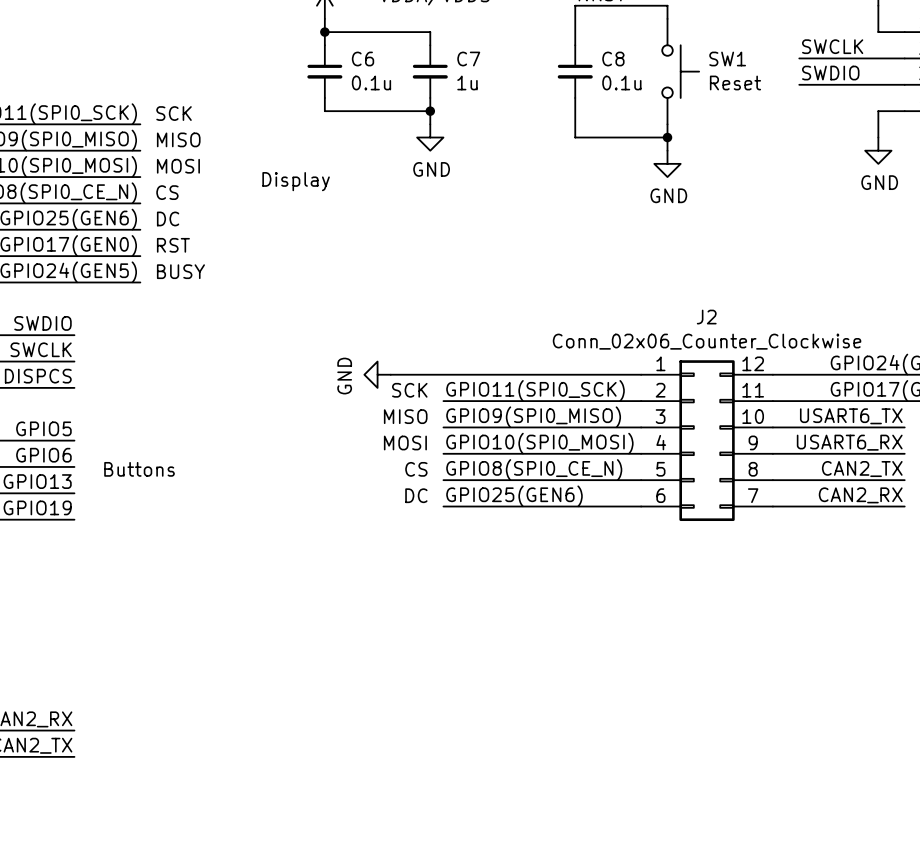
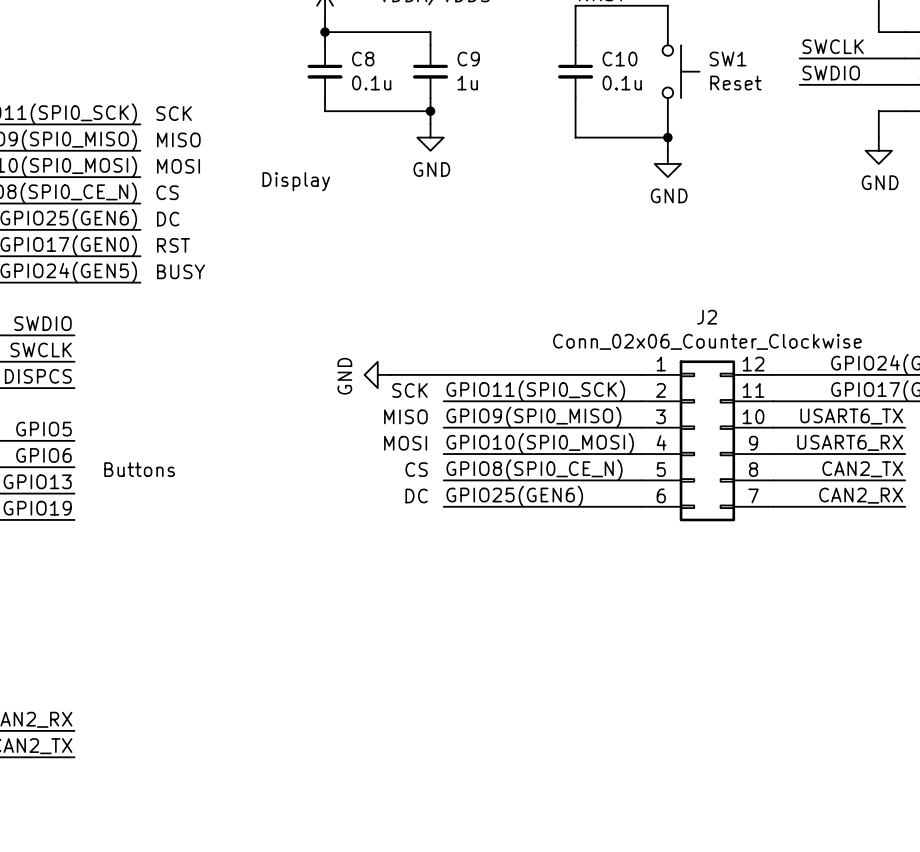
C6 name: C6 (363, 59) -> C8 (363, 59)
C7 name: C7 (468, 59) -> C9 (468, 59)
C8 name: C8 (613, 59) -> C10 (620, 59)

